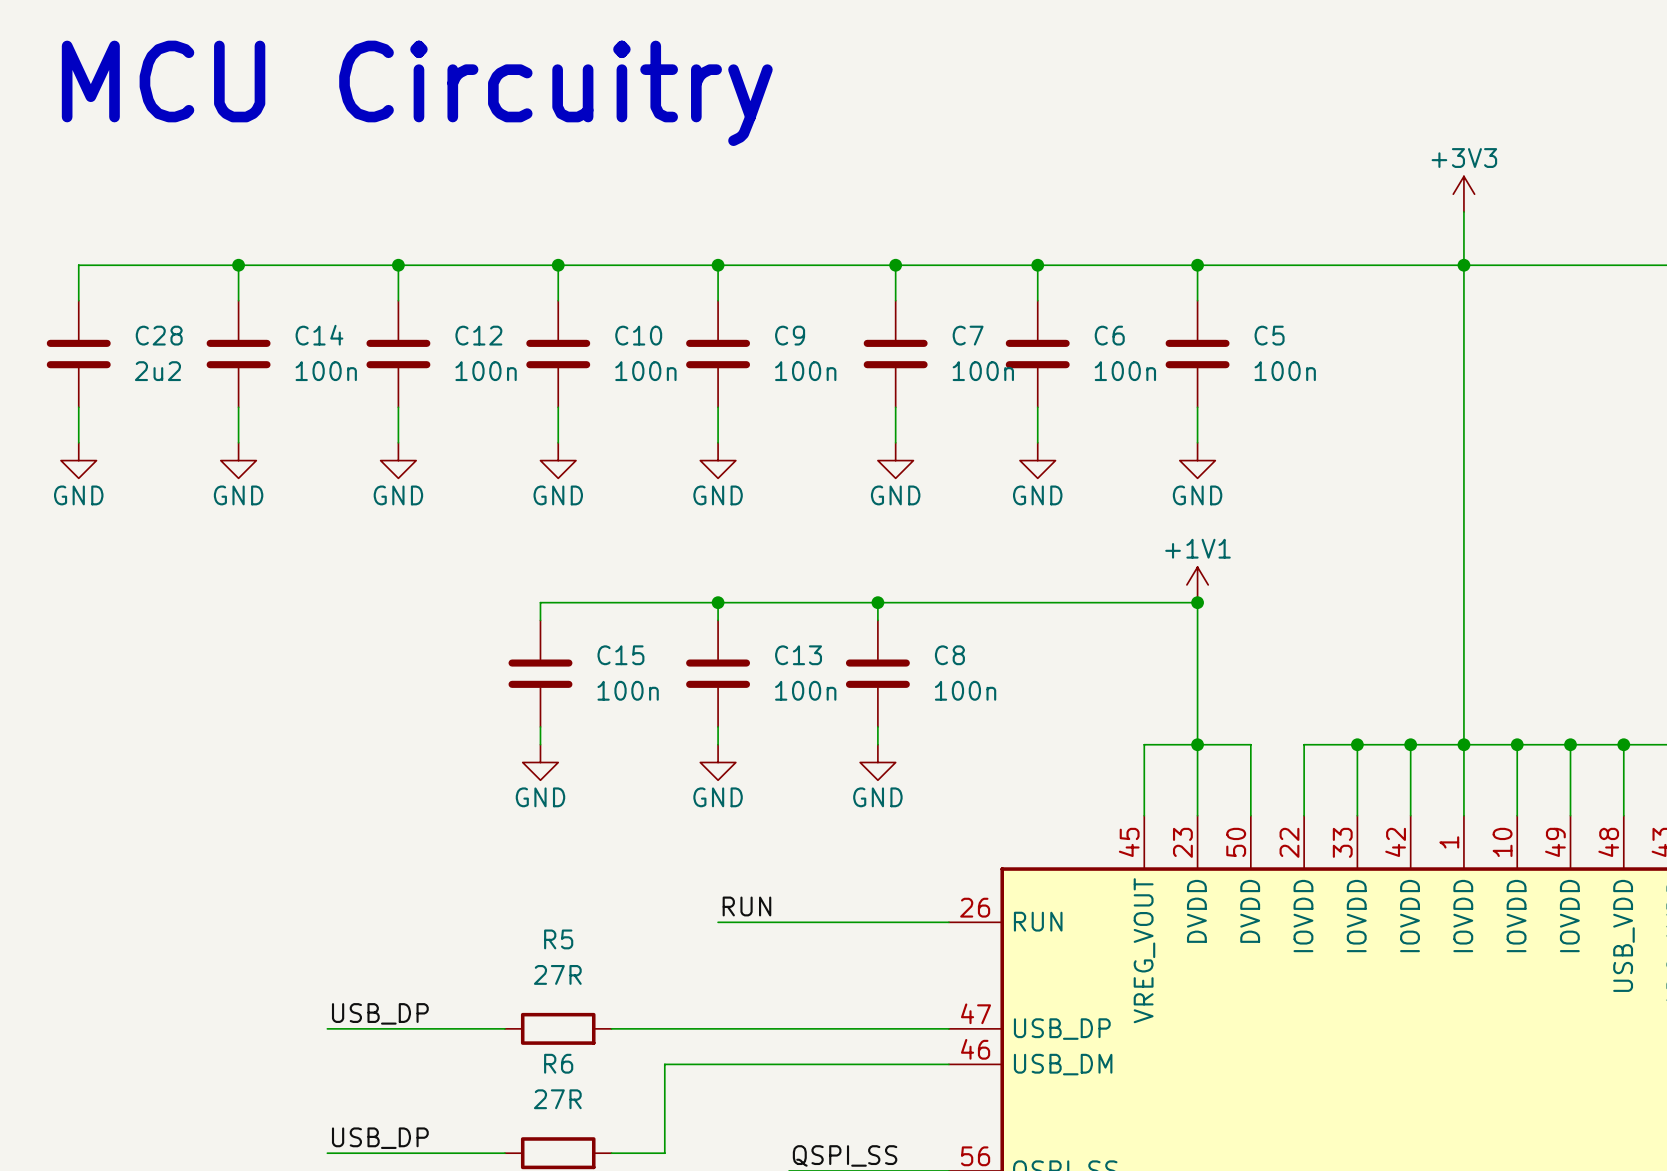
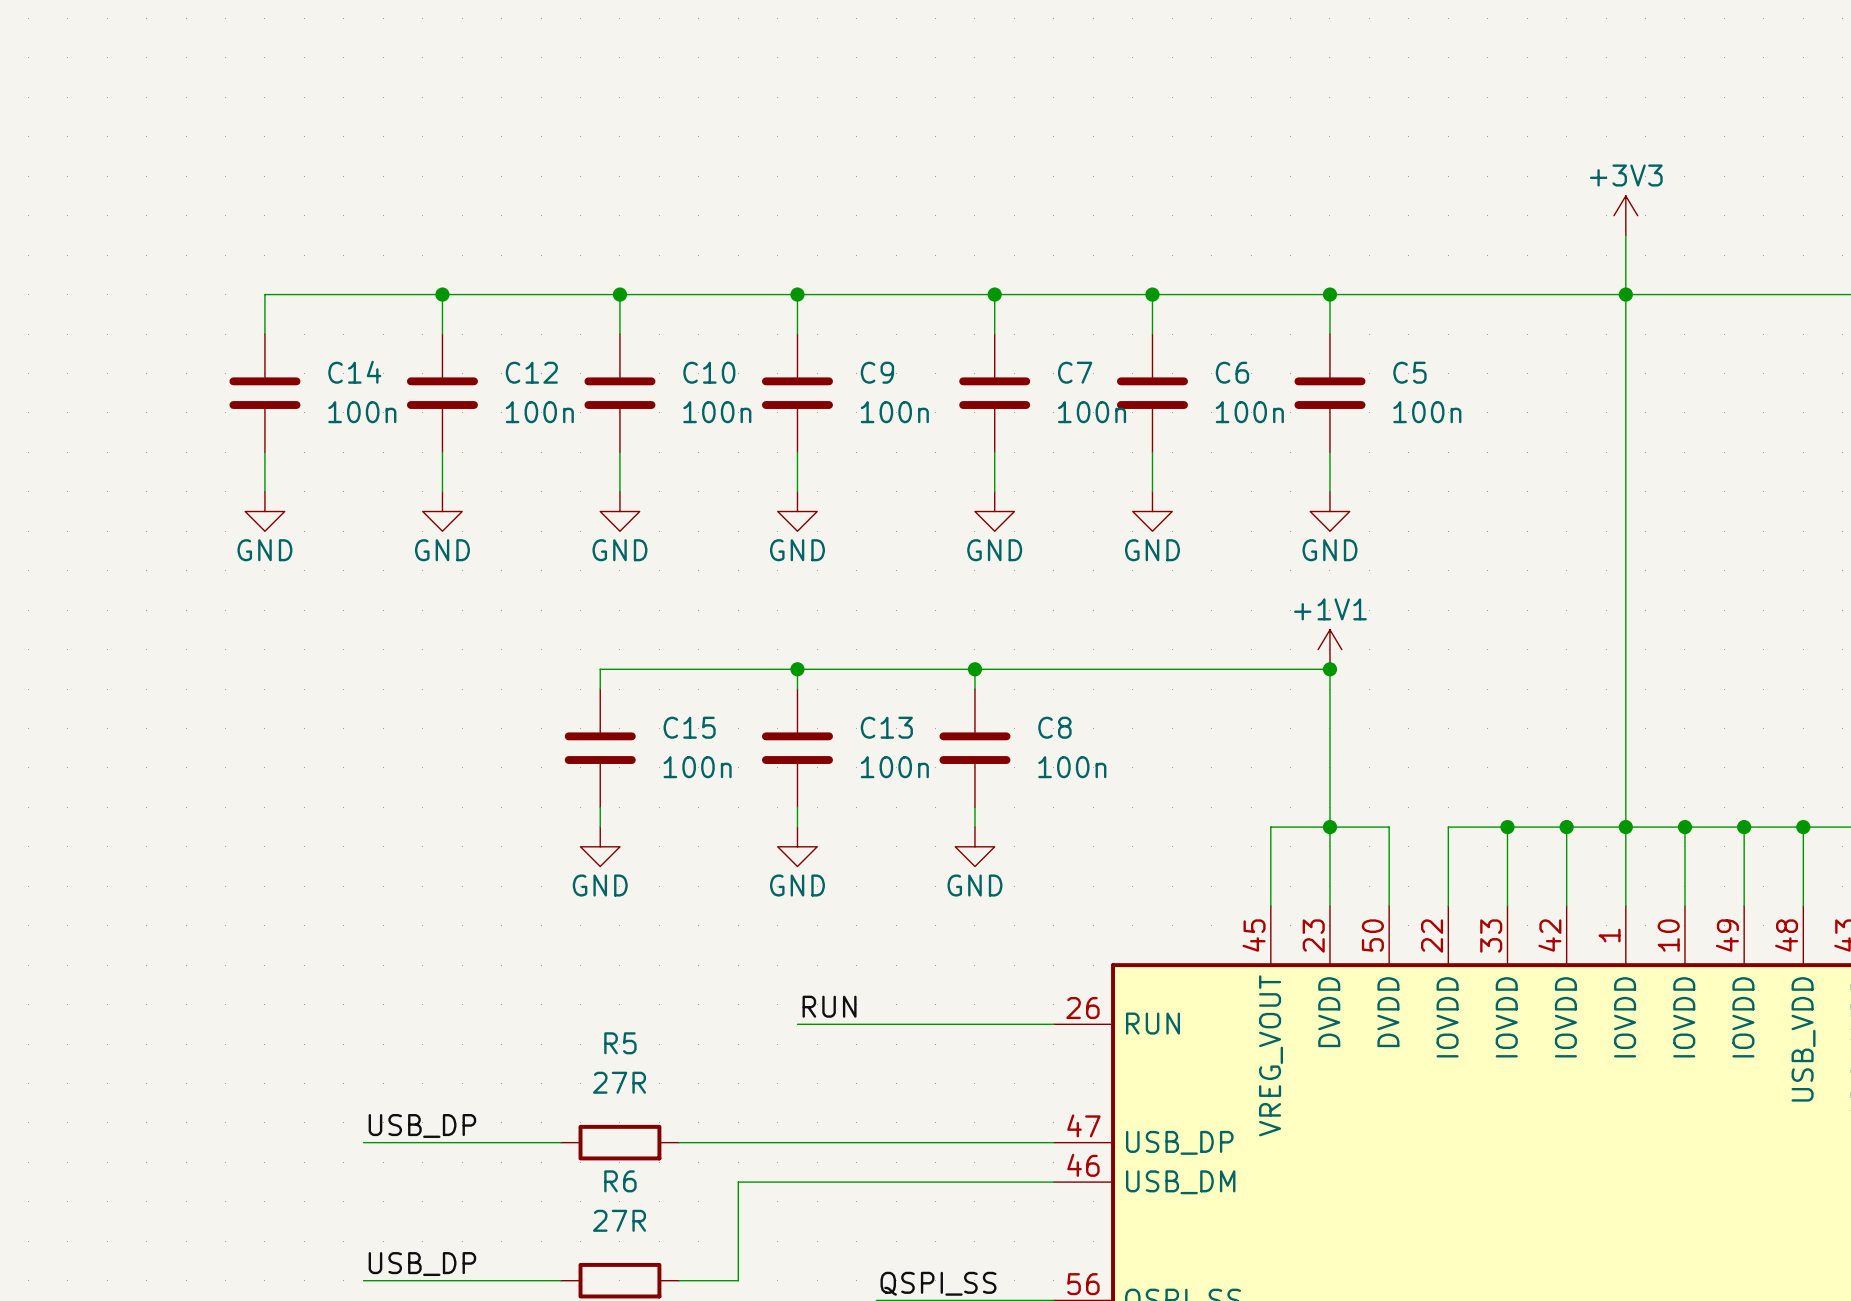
text: MCU Circuitry (417, 93) -> none
wire: (238, 265) (78, 265) (78, 300) -> none
junction: (238, 265) -> none
C28: 2u2 (78, 354) -> none
wire: (78, 407) (78, 442) -> none
power symbol: GND (78, 460) -> none

